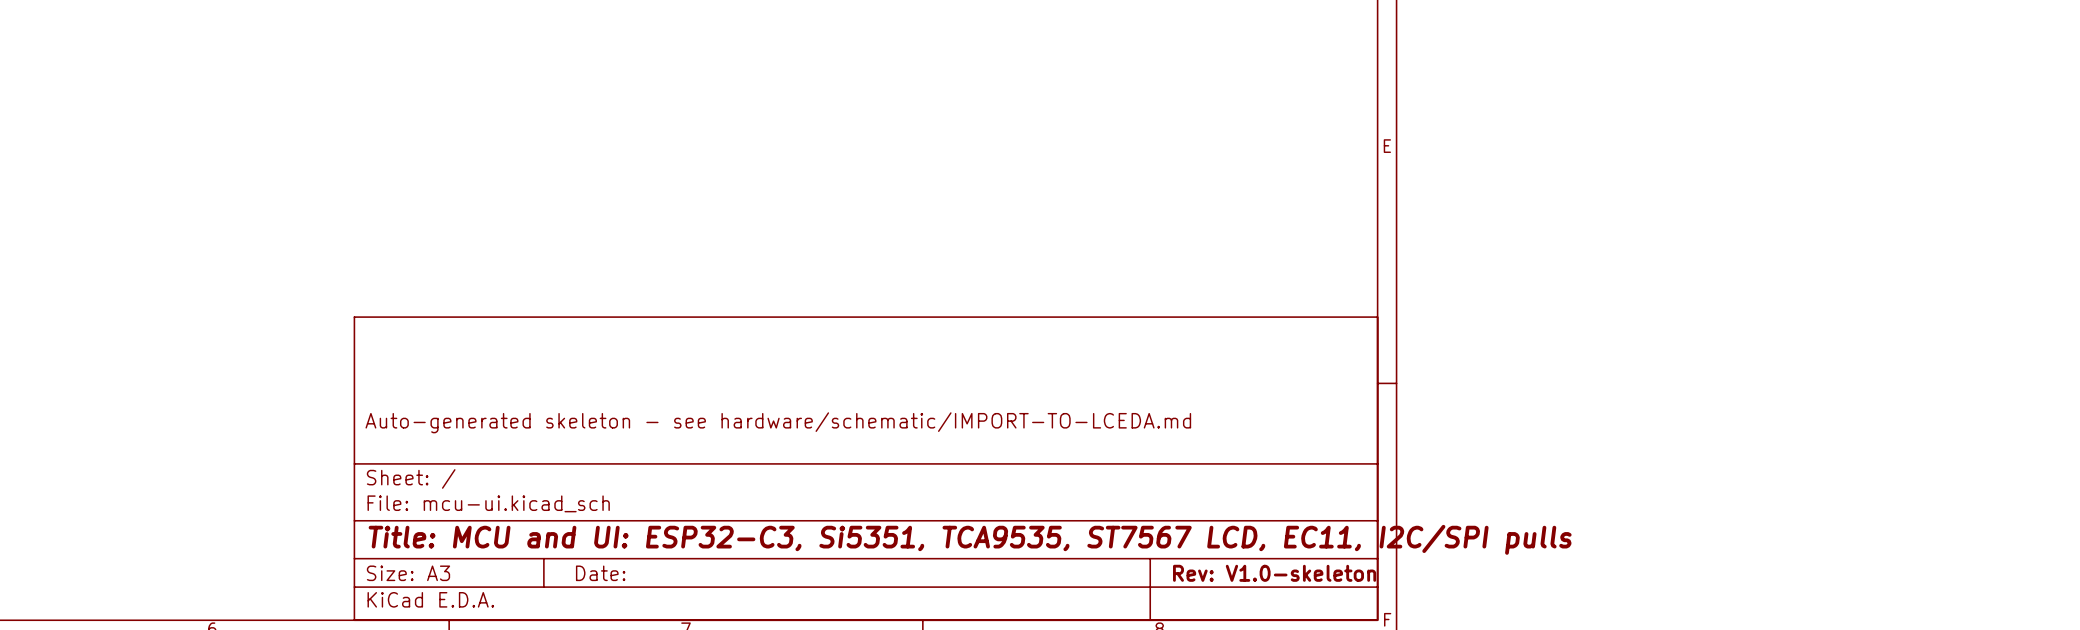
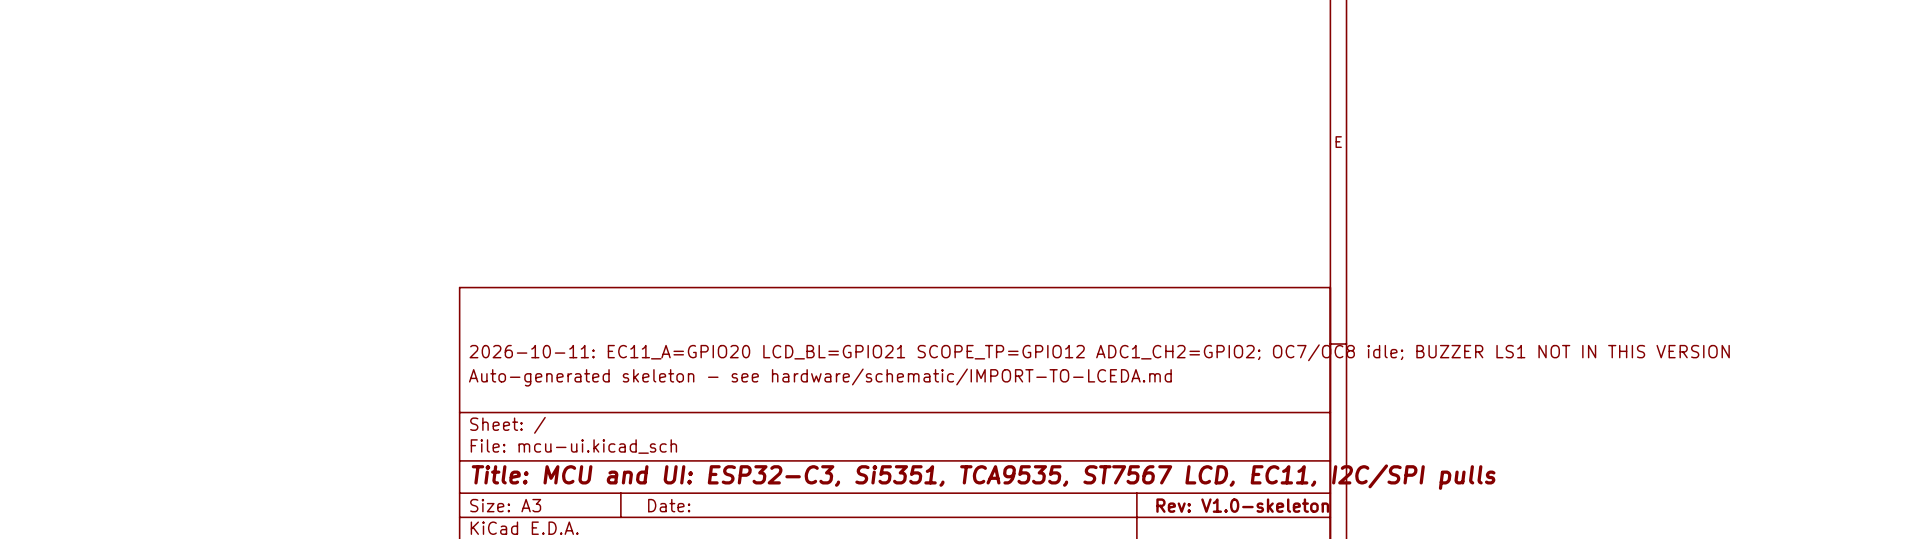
title block: none -> 2026-10-11: EC11_A=GPIO20 LCD_BL=GPIO21 SCOPE_TP=GPIO12 ADC1_CH2=GPIO2; OC7/OC8 idle; BUZZER LS1 NOT IN THIS VERSION (1099, 352)

